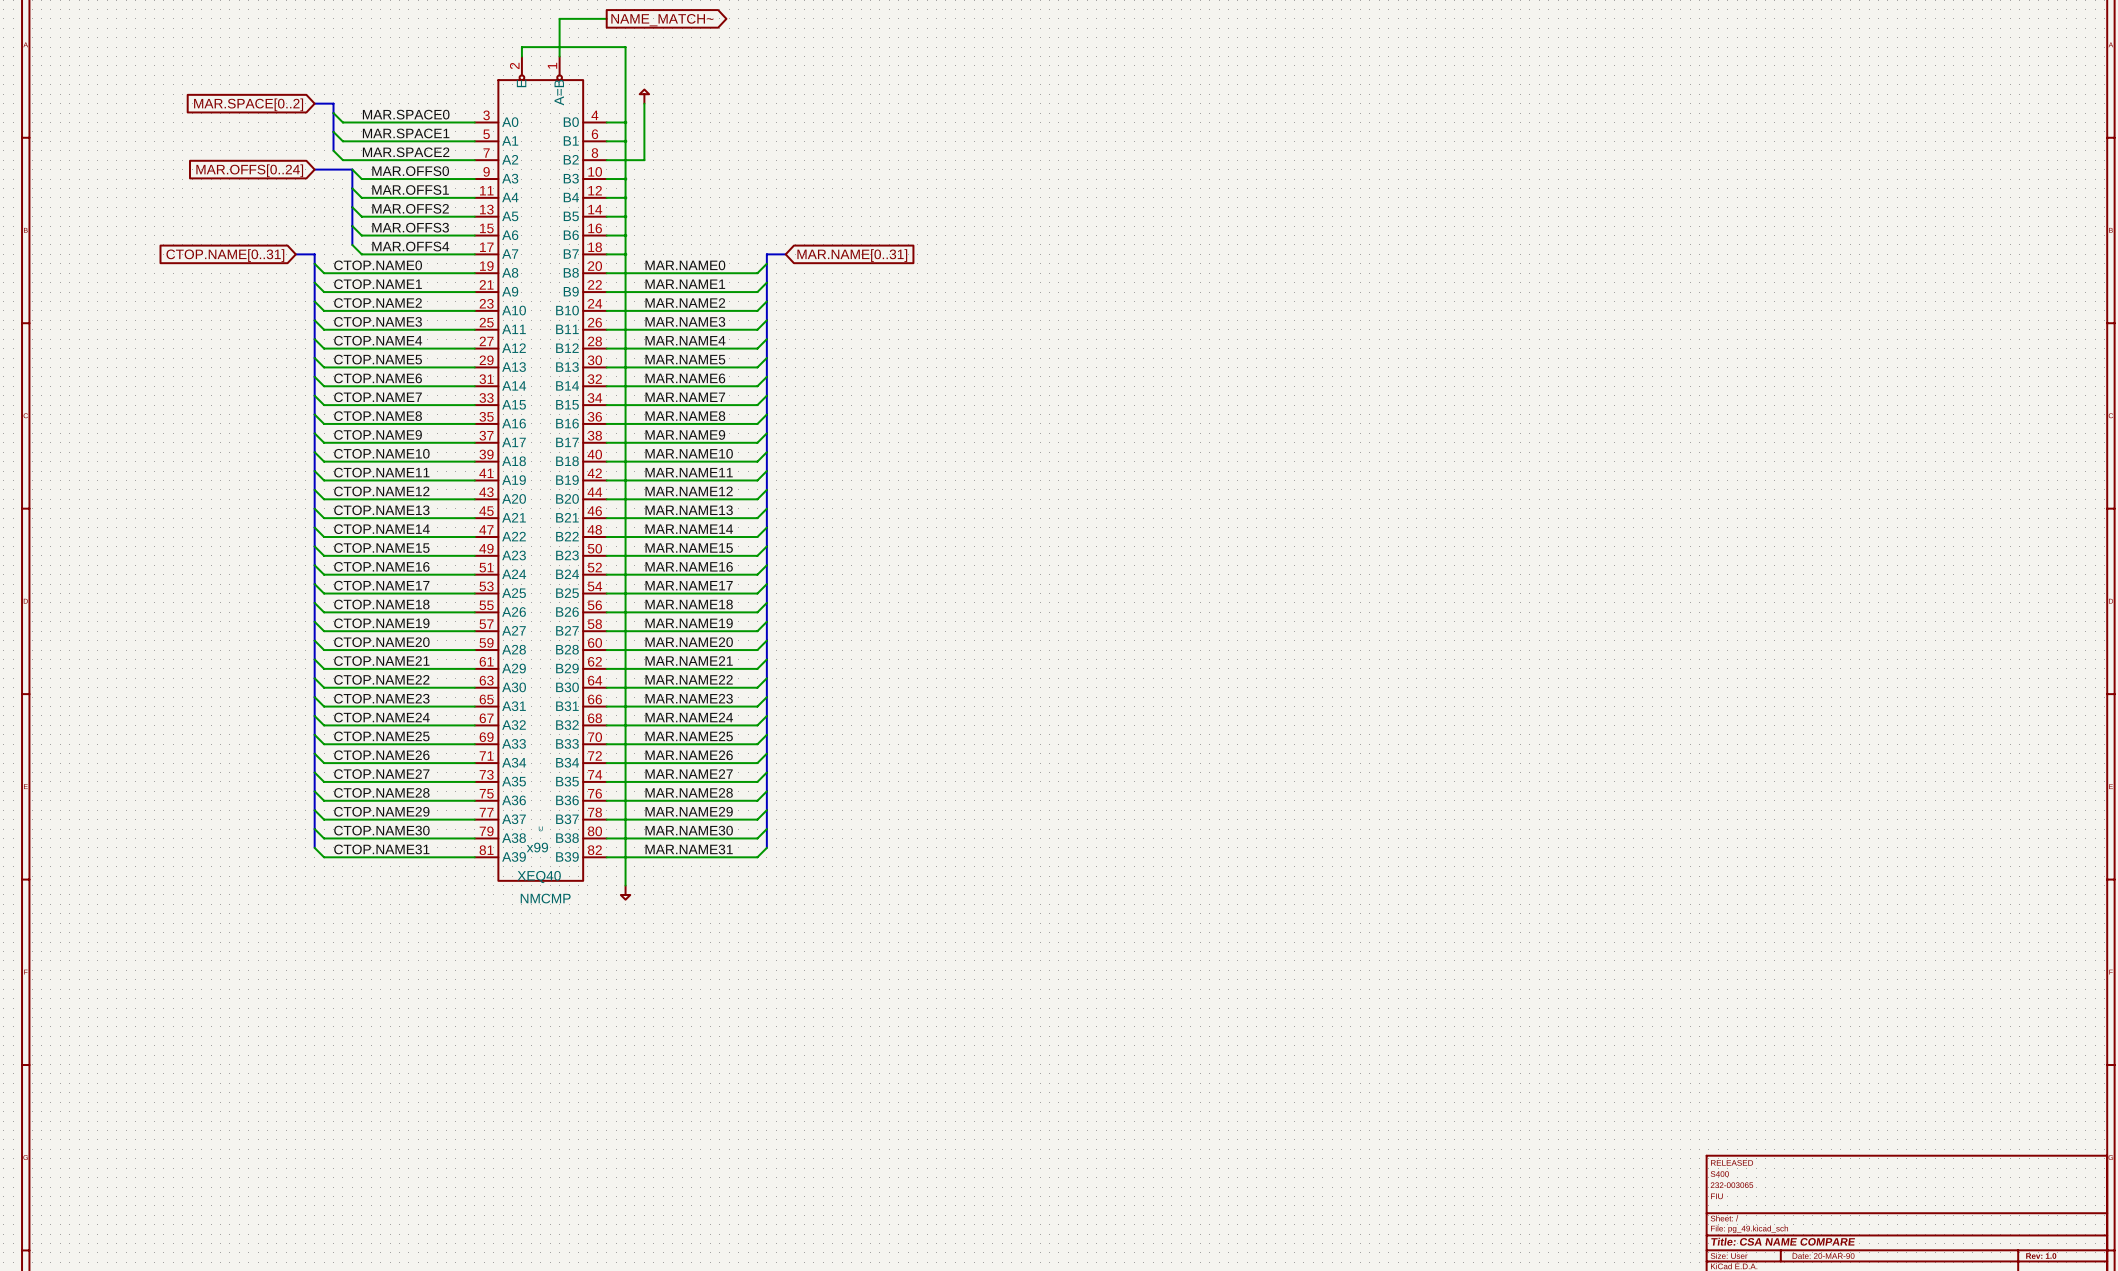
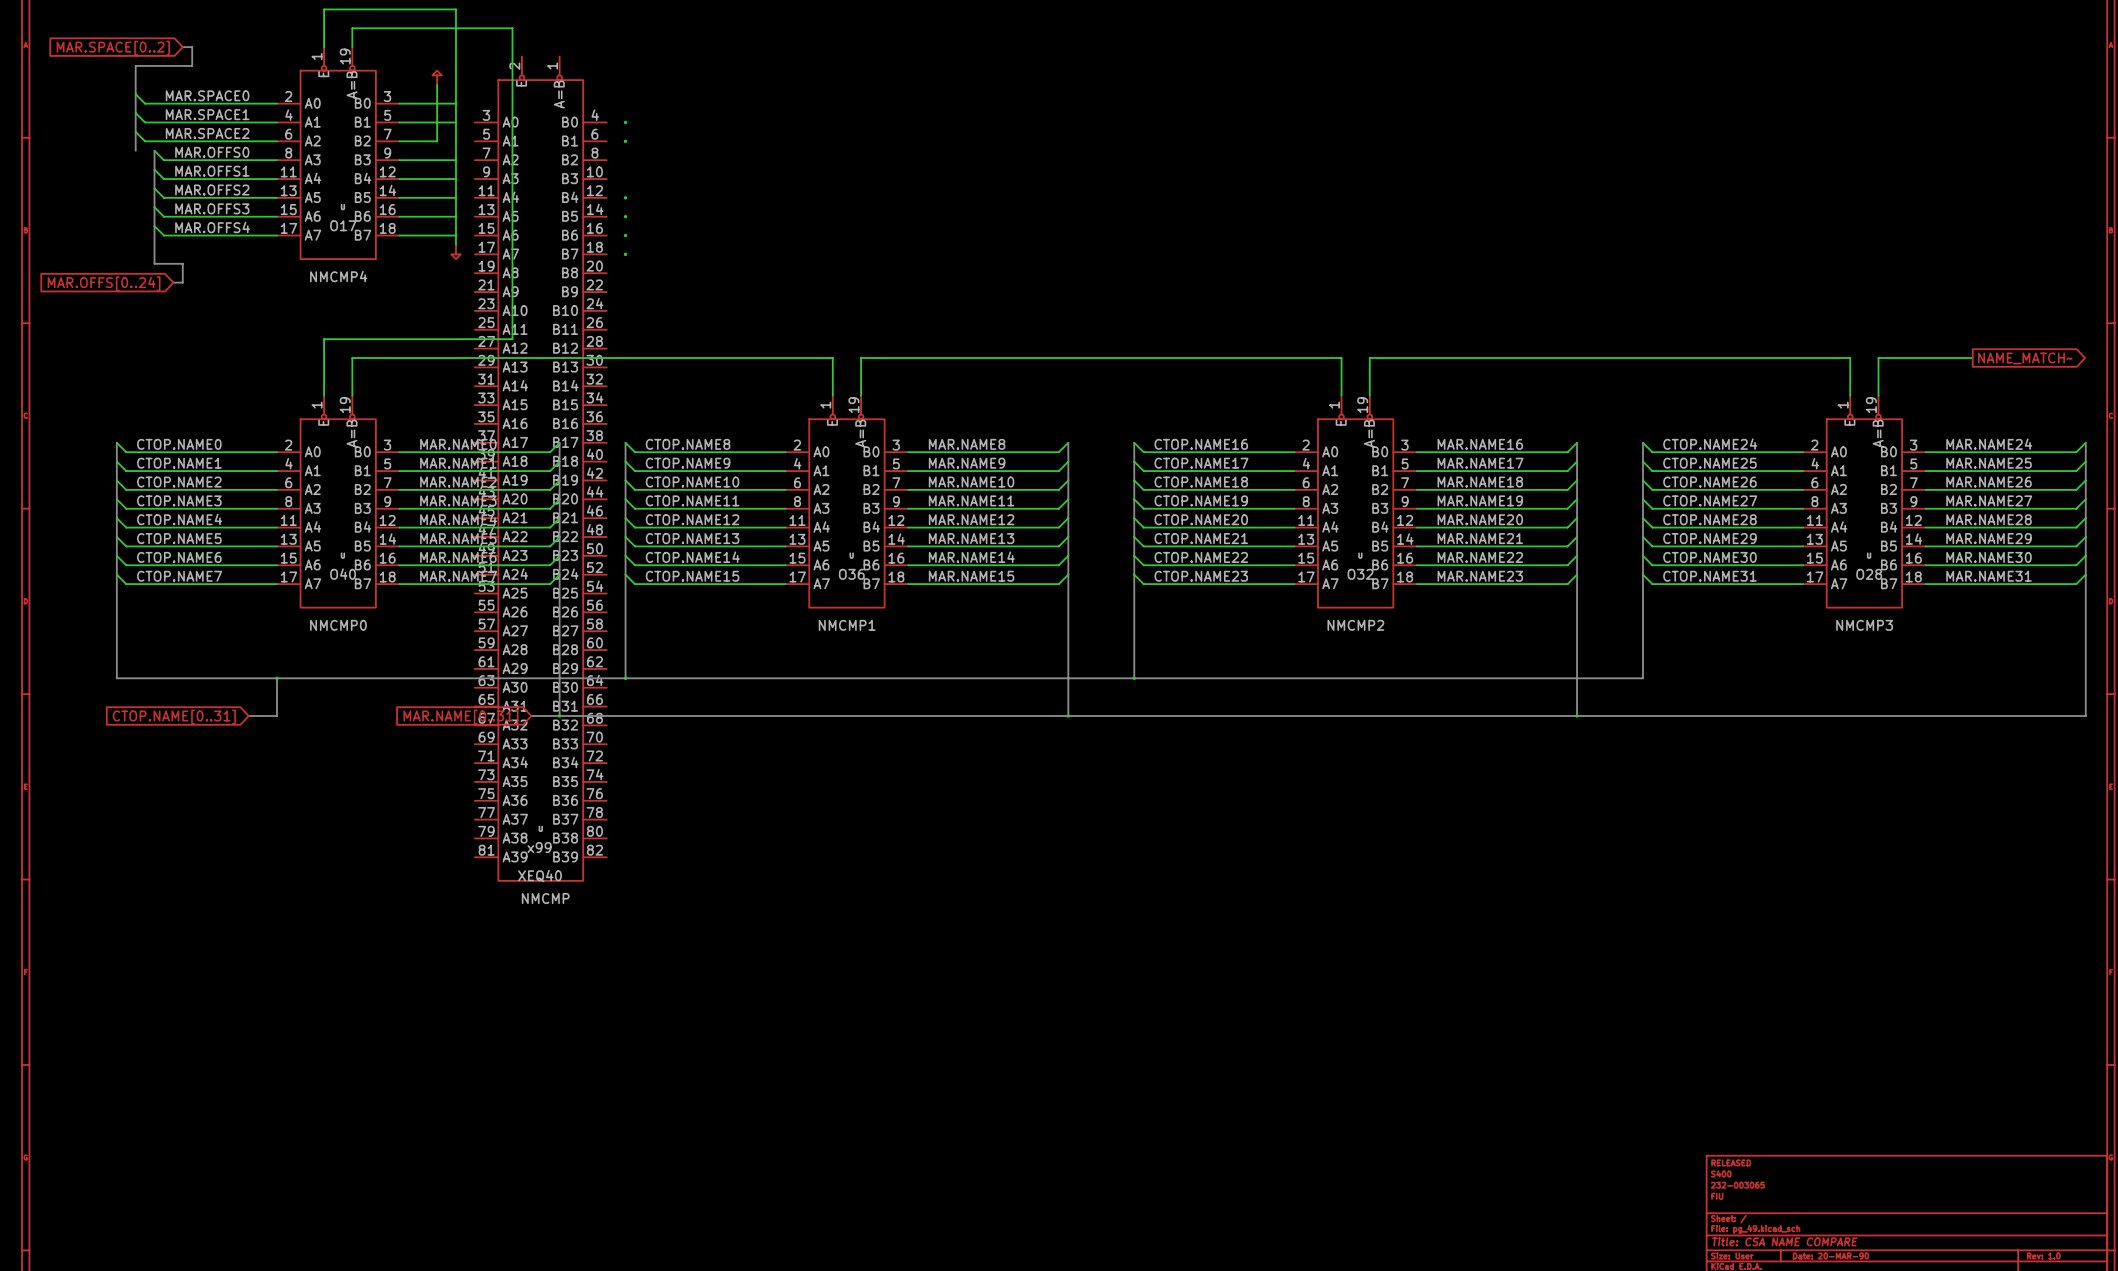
wire: (606, 18) (559, 18) (559, 56) -> none
global label: NAME_MATCH~ (662, 20) -> none
bus: none -> (182, 47) (192, 47) (192, 65) (135, 65) (135, 150)
wire: none -> (324, 47) (324, 9) (455, 9) (455, 244)
wire: none -> (352, 47) (352, 28) (512, 28) (512, 339) (324, 339) (324, 395)
global label: none -> MAR.SPACE[0..2] (113, 48)
wire: (521, 56) (521, 47) (625, 47) (625, 885) -> none
power symbol: none -> (437, 77)
wire: none -> (135, 94) (145, 103) (276, 103)
label: none -> MAR.SPACE0 (207, 95)
power symbol: (644, 96) -> none
bus: (314, 103) (333, 103) (333, 150) -> none
wire: none -> (399, 103) (455, 103)
wire: (644, 103) (644, 160) (606, 160) -> none
global label: MAR.SPACE[0..2] (248, 104) -> none
wire: none -> (135, 113) (145, 122) (276, 122)
wire: (333, 113) (342, 122) (399, 122) -> none
label: none -> MAR.SPACE1 (207, 114)
label: MAR.SPACE0 (406, 114) -> none
wire: (455, 122) (474, 122) -> none
wire: (606, 122) (625, 122) -> none
wire: none -> (135, 131) (145, 141) (276, 141)
wire: (333, 131) (342, 141) (399, 141) -> none
label: none -> MAR.SPACE2 (207, 133)
label: MAR.SPACE1 (406, 133) -> none
wire: (437, 141) (474, 141) -> (437, 141) (437, 84)
wire: (606, 141) (625, 141) -> none
wire: none -> (154, 150) (163, 160) (276, 160)
bus: none -> (154, 150) (154, 263) (182, 263) (182, 282) (173, 282)
wire: (333, 150) (342, 160) (399, 160) -> none
label: none -> MAR.OFFS0 (212, 152)
label: MAR.SPACE2 (406, 152) -> none
part: none -> (338, 153)
wire: (455, 160) (474, 160) -> none
wire: none -> (154, 169) (163, 179) (276, 179)
bus: (314, 169) (352, 169) (352, 244) -> none
global label: MAR.OFFS[0..24] (249, 170) -> none
label: none -> MAR.OFFS1 (212, 171)
label: MAR.OFFS0 (410, 171) -> none
wire: (455, 179) (474, 179) -> none
wire: (606, 179) (625, 179) -> none
wire: none -> (154, 188) (163, 197) (276, 197)
label: none -> MAR.OFFS2 (212, 190)
label: MAR.OFFS1 (410, 190) -> none
wire: (455, 197) (474, 197) -> none
wire: (606, 197) (625, 197) -> none
wire: none -> (154, 207) (163, 216) (276, 216)
label: none -> MAR.OFFS3 (212, 208)
label: MAR.OFFS2 (410, 208) -> none
wire: (455, 216) (474, 216) -> none
wire: (606, 216) (625, 216) -> none
wire: none -> (154, 226) (163, 235) (276, 235)
label: none -> MAR.OFFS4 (212, 227)
label: MAR.OFFS3 (410, 227) -> none
wire: (455, 235) (474, 235) -> none
wire: (606, 235) (625, 235) -> none
wire: (352, 244) (361, 254) (474, 254) -> none
label: MAR.OFFS4 (410, 246) -> none
power symbol: none -> (455, 252)
bus: (295, 254) (314, 254) (314, 847) -> none
wire: (606, 254) (625, 254) -> none
bus: (785, 254) (766, 254) (766, 847) -> none
global label: CTOP.NAME[0..31] (225, 255) -> none
global label: MAR.NAME[0..31] (852, 255) -> none
wire: (314, 263) (324, 273) (474, 273) -> none
wire: (766, 263) (757, 273) (606, 273) -> none
label: CTOP.NAME0 (378, 265) -> none
label: MAR.NAME0 (685, 265) -> none
wire: (314, 282) (324, 292) (474, 292) -> none
wire: (766, 282) (757, 292) (606, 292) -> none
global label: none -> MAR.OFFS[0..24] (104, 283)
label: CTOP.NAME1 (378, 284) -> none
label: MAR.NAME1 (685, 284) -> none
wire: (314, 301) (324, 310) (474, 310) -> none
wire: (766, 301) (757, 310) (606, 310) -> none
label: MAR.NAME2 (685, 302) -> none
label: CTOP.NAME2 (378, 303) -> none
wire: (314, 320) (324, 329) (474, 329) -> none
wire: (766, 320) (757, 329) (606, 329) -> none
label: CTOP.NAME3 (378, 321) -> none
label: MAR.NAME3 (685, 321) -> none
wire: (314, 339) (324, 348) (474, 348) -> none
wire: (766, 339) (757, 348) (606, 348) -> none
label: CTOP.NAME4 (378, 340) -> none
label: MAR.NAME4 (685, 340) -> none
wire: (314, 358) (324, 367) (474, 367) -> none
wire: (766, 358) (757, 367) (606, 367) -> none
wire: none -> (1972, 358) (1878, 358) (1878, 395)
label: CTOP.NAME5 (378, 359) -> none
label: MAR.NAME5 (685, 359) -> none
global label: none -> NAME_MATCH~ (2025, 358)
wire: (314, 376) (324, 386) (474, 386) -> none
wire: (766, 376) (757, 386) (606, 386) -> none
label: CTOP.NAME6 (378, 378) -> none
label: MAR.NAME6 (685, 378) -> none
wire: (314, 395) (324, 405) (474, 405) -> none
wire: none -> (352, 395) (352, 358) (832, 358) (832, 395)
wire: (766, 395) (757, 405) (606, 405) -> none
wire: none -> (861, 395) (861, 358) (1341, 358) (1341, 395)
wire: none -> (1369, 395) (1369, 358) (1850, 358) (1850, 395)
label: CTOP.NAME7 (378, 397) -> none
label: MAR.NAME7 (685, 397) -> none
wire: (314, 414) (324, 423) (474, 423) -> none
wire: (766, 414) (757, 423) (606, 423) -> none
label: CTOP.NAME8 (378, 416) -> none
label: MAR.NAME8 (685, 416) -> none
wire: (314, 433) (324, 442) (474, 442) -> none
wire: (766, 433) (757, 442) (606, 442) -> none
label: CTOP.NAME9 (378, 434) -> none
label: MAR.NAME9 (685, 434) -> none
wire: none -> (116, 442) (126, 452) (276, 452)
bus: none -> (116, 442) (116, 678) (1642, 678) (1642, 442)
wire: none -> (559, 442) (550, 452) (399, 452)
bus: none -> (559, 442) (559, 715)
wire: none -> (625, 442) (634, 452) (785, 452)
bus: none -> (625, 442) (625, 678)
wire: none -> (1068, 442) (1058, 452) (908, 452)
bus: none -> (1068, 442) (1068, 715)
wire: none -> (1134, 442) (1143, 452) (1294, 452)
bus: none -> (1134, 442) (1134, 678)
wire: none -> (1577, 442) (1567, 452) (1416, 452)
bus: none -> (1577, 442) (1577, 715)
wire: none -> (1642, 442) (1652, 452) (1803, 452)
wire: none -> (2085, 442) (2076, 452) (1925, 452)
bus: none -> (2085, 442) (2085, 715) (531, 715)
label: none -> CTOP.NAME0 (179, 444)
label: none -> MAR.NAME0 (458, 444)
label: none -> CTOP.NAME8 (688, 444)
label: none -> MAR.NAME8 (967, 444)
label: none -> CTOP.NAME16 (1201, 444)
label: none -> MAR.NAME16 (1480, 444)
label: none -> CTOP.NAME24 (1710, 444)
label: none -> MAR.NAME24 (1989, 444)
wire: (314, 452) (324, 461) (474, 461) -> none
wire: (766, 452) (757, 461) (606, 461) -> none
label: CTOP.NAME10 (381, 453) -> none
label: MAR.NAME10 (689, 453) -> none
wire: none -> (116, 461) (126, 471) (276, 471)
wire: none -> (559, 461) (550, 471) (399, 471)
wire: none -> (625, 461) (634, 471) (785, 471)
wire: none -> (1068, 461) (1058, 471) (908, 471)
wire: none -> (1134, 461) (1143, 471) (1294, 471)
wire: none -> (1577, 461) (1567, 471) (1416, 471)
wire: none -> (1642, 461) (1652, 471) (1803, 471)
wire: none -> (2085, 461) (2076, 471) (1925, 471)
label: none -> CTOP.NAME1 (179, 463)
label: none -> MAR.NAME1 (458, 463)
label: none -> CTOP.NAME9 (688, 463)
label: none -> MAR.NAME9 (967, 463)
label: none -> CTOP.NAME17 (1201, 463)
label: none -> MAR.NAME17 (1480, 463)
label: none -> CTOP.NAME25 (1709, 463)
label: none -> MAR.NAME25 (1989, 463)
wire: (314, 471) (324, 480) (474, 480) -> none
wire: (766, 471) (757, 480) (606, 480) -> none
label: CTOP.NAME11 (381, 472) -> none
label: MAR.NAME11 (689, 472) -> none
wire: none -> (116, 480) (126, 489) (276, 489)
wire: none -> (559, 480) (550, 489) (399, 489)
wire: none -> (625, 480) (634, 489) (785, 489)
wire: none -> (1068, 480) (1058, 489) (908, 489)
wire: none -> (1134, 480) (1143, 489) (1294, 489)
wire: none -> (1577, 480) (1567, 489) (1416, 489)
wire: none -> (1642, 480) (1652, 489) (1803, 489)
wire: none -> (2085, 480) (2076, 489) (1925, 489)
label: none -> MAR.NAME2 (458, 482)
label: none -> CTOP.NAME2 (179, 482)
label: none -> CTOP.NAME10 (692, 482)
label: none -> MAR.NAME10 (971, 482)
label: none -> CTOP.NAME18 (1201, 482)
label: none -> MAR.NAME18 (1480, 482)
label: none -> CTOP.NAME26 (1709, 482)
label: none -> MAR.NAME26 (1989, 482)
wire: (314, 489) (324, 499) (474, 499) -> none
wire: (766, 489) (757, 499) (606, 499) -> none
label: CTOP.NAME12 (381, 491) -> none
label: MAR.NAME12 (689, 491) -> none
wire: none -> (116, 499) (126, 508) (276, 508)
wire: none -> (559, 499) (550, 508) (399, 508)
wire: none -> (625, 499) (634, 508) (785, 508)
wire: none -> (1068, 499) (1058, 508) (908, 508)
wire: none -> (1134, 499) (1143, 508) (1294, 508)
wire: none -> (1577, 499) (1567, 508) (1416, 508)
wire: none -> (1642, 499) (1652, 508) (1803, 508)
wire: none -> (2085, 499) (2076, 508) (1925, 508)
label: none -> CTOP.NAME3 (179, 500)
label: none -> MAR.NAME3 (458, 500)
label: none -> CTOP.NAME11 (692, 500)
label: none -> MAR.NAME11 (971, 500)
label: none -> CTOP.NAME19 (1201, 500)
label: none -> MAR.NAME19 (1480, 500)
label: none -> CTOP.NAME27 (1710, 500)
label: none -> MAR.NAME27 (1989, 500)
part: none -> (338, 501)
part: none -> (846, 501)
part: none -> (1355, 501)
part: none -> (1864, 501)
wire: (314, 508) (324, 518) (474, 518) -> none
wire: (766, 508) (757, 518) (606, 518) -> none
label: CTOP.NAME13 (381, 510) -> none
label: MAR.NAME13 (689, 510) -> none
wire: none -> (116, 518) (126, 527) (276, 527)
wire: none -> (559, 518) (550, 527) (399, 527)
wire: none -> (625, 518) (634, 527) (785, 527)
wire: none -> (1068, 518) (1058, 527) (908, 527)
wire: none -> (1134, 518) (1143, 527) (1294, 527)
wire: none -> (1577, 518) (1567, 527) (1416, 527)
wire: none -> (1642, 518) (1652, 527) (1803, 527)
wire: none -> (2085, 518) (2076, 527) (1925, 527)
label: none -> CTOP.NAME4 (179, 519)
label: none -> MAR.NAME4 (458, 519)
label: none -> CTOP.NAME12 (692, 519)
label: none -> MAR.NAME12 (971, 519)
label: none -> CTOP.NAME20 (1201, 519)
label: none -> MAR.NAME20 (1480, 519)
label: none -> CTOP.NAME28 (1709, 519)
label: none -> MAR.NAME28 (1989, 519)
wire: (314, 527) (324, 537) (474, 537) -> none
wire: (766, 527) (757, 537) (606, 537) -> none
label: CTOP.NAME14 (381, 529) -> none
label: MAR.NAME14 (689, 529) -> none
wire: none -> (116, 537) (126, 546) (276, 546)
wire: none -> (559, 537) (550, 546) (399, 546)
wire: none -> (625, 537) (634, 546) (785, 546)
wire: none -> (1068, 537) (1058, 546) (908, 546)
wire: none -> (1134, 537) (1143, 546) (1294, 546)
wire: none -> (1577, 537) (1567, 546) (1416, 546)
wire: none -> (1642, 537) (1652, 546) (1803, 546)
wire: none -> (2085, 537) (2076, 546) (1925, 546)
label: none -> CTOP.NAME5 (179, 538)
label: none -> MAR.NAME5 (458, 538)
label: none -> CTOP.NAME13 (692, 538)
label: none -> MAR.NAME13 (971, 538)
label: none -> CTOP.NAME21 (1201, 538)
label: none -> MAR.NAME21 (1480, 538)
label: none -> CTOP.NAME29 (1709, 538)
label: none -> MAR.NAME29 (1989, 538)
wire: (314, 546) (324, 555) (474, 555) -> none
wire: (766, 546) (757, 555) (606, 555) -> none
label: CTOP.NAME15 (381, 547) -> none
label: MAR.NAME15 (689, 548) -> none
wire: none -> (116, 555) (126, 565) (276, 565)
wire: none -> (559, 555) (550, 565) (399, 565)
wire: none -> (625, 555) (634, 565) (785, 565)
wire: none -> (1068, 555) (1058, 565) (908, 565)
wire: none -> (1134, 555) (1143, 565) (1294, 565)
wire: none -> (1577, 555) (1567, 565) (1416, 565)
wire: none -> (1642, 555) (1652, 565) (1803, 565)
wire: none -> (2085, 555) (2076, 565) (1925, 565)
label: none -> CTOP.NAME6 (179, 557)
label: none -> MAR.NAME6 (458, 557)
label: none -> CTOP.NAME14 (692, 557)
label: none -> MAR.NAME14 (971, 557)
label: none -> CTOP.NAME22 (1201, 557)
label: none -> MAR.NAME22 (1480, 557)
label: none -> CTOP.NAME30 (1709, 557)
label: none -> MAR.NAME30 (1989, 557)
wire: (314, 565) (324, 574) (474, 574) -> none
wire: (766, 565) (757, 574) (606, 574) -> none
label: CTOP.NAME16 (381, 566) -> none
label: MAR.NAME16 (689, 566) -> none
wire: none -> (116, 574) (126, 584) (276, 584)
wire: none -> (559, 574) (550, 584) (399, 584)
wire: none -> (625, 574) (634, 584) (785, 584)
wire: none -> (1068, 574) (1058, 584) (908, 584)
wire: none -> (1134, 574) (1143, 584) (1294, 584)
wire: none -> (1577, 574) (1567, 584) (1416, 584)
wire: none -> (1642, 574) (1652, 584) (1803, 584)
wire: none -> (2085, 574) (2076, 584) (1925, 584)
label: none -> CTOP.NAME7 (179, 576)
label: none -> MAR.NAME7 (458, 576)
label: none -> CTOP.NAME15 (692, 576)
label: none -> MAR.NAME15 (971, 576)
label: none -> CTOP.NAME23 (1201, 576)
label: none -> MAR.NAME23 (1480, 576)
label: none -> CTOP.NAME31 (1709, 576)
label: none -> MAR.NAME31 (1989, 576)
wire: (314, 584) (324, 593) (474, 593) -> none
wire: (766, 584) (757, 593) (606, 593) -> none
label: CTOP.NAME17 (381, 585) -> none
label: MAR.NAME17 (689, 585) -> none
wire: (314, 602) (324, 612) (474, 612) -> none
wire: (766, 602) (757, 612) (606, 612) -> none
label: CTOP.NAME18 (381, 604) -> none
label: MAR.NAME18 (689, 604) -> none
wire: (314, 621) (324, 631) (474, 631) -> none
wire: (766, 621) (757, 631) (606, 631) -> none
label: CTOP.NAME19 (381, 623) -> none
label: MAR.NAME19 (689, 623) -> none
wire: (314, 640) (324, 650) (474, 650) -> none
wire: (766, 640) (757, 650) (606, 650) -> none
label: CTOP.NAME20 (381, 642) -> none
label: MAR.NAME20 (689, 642) -> none
wire: (314, 659) (324, 668) (474, 668) -> none
wire: (766, 659) (757, 668) (606, 668) -> none
label: MAR.NAME21 (689, 660) -> none
label: CTOP.NAME21 (381, 661) -> none
bus: none -> (276, 678) (276, 715) (248, 715)
junction: none -> (276, 678)
wire: (314, 678) (324, 687) (474, 687) -> none
junction: none -> (625, 678)
wire: (766, 678) (757, 687) (606, 687) -> none
junction: none -> (1134, 678)
label: CTOP.NAME22 (381, 679) -> none
label: MAR.NAME22 (689, 679) -> none
wire: (314, 697) (324, 706) (474, 706) -> none
wire: (766, 697) (757, 706) (606, 706) -> none
label: CTOP.NAME23 (381, 698) -> none
label: MAR.NAME23 (689, 698) -> none
wire: (314, 715) (324, 725) (474, 725) -> none
junction: none -> (559, 715)
wire: (766, 715) (757, 725) (606, 725) -> none
junction: none -> (1068, 715)
junction: none -> (1577, 715)
global label: none -> CTOP.NAME[0..31] (174, 717)
label: CTOP.NAME24 (381, 717) -> none
global label: none -> MAR.NAME[0..31] (460, 717)
label: MAR.NAME24 (689, 717) -> none
wire: (314, 734) (324, 744) (474, 744) -> none
wire: (766, 734) (757, 744) (606, 744) -> none
label: CTOP.NAME25 (381, 736) -> none
label: MAR.NAME25 (689, 736) -> none
wire: (314, 753) (324, 763) (474, 763) -> none
wire: (766, 753) (757, 763) (606, 763) -> none
label: CTOP.NAME26 (381, 755) -> none
label: MAR.NAME26 (689, 755) -> none
wire: (314, 772) (324, 781) (474, 781) -> none
wire: (766, 772) (757, 781) (606, 781) -> none
label: CTOP.NAME27 (381, 774) -> none
label: MAR.NAME27 (689, 774) -> none
wire: (314, 791) (324, 800) (474, 800) -> none
wire: (766, 791) (757, 800) (606, 800) -> none
label: CTOP.NAME28 (381, 792) -> none
label: MAR.NAME28 (689, 792) -> none
wire: (314, 810) (324, 819) (474, 819) -> none
wire: (766, 810) (757, 819) (606, 819) -> none
label: CTOP.NAME29 (381, 811) -> none
label: MAR.NAME29 (689, 811) -> none
wire: (314, 829) (324, 838) (474, 838) -> none
wire: (766, 829) (757, 838) (606, 838) -> none
label: CTOP.NAME30 (381, 830) -> none
label: MAR.NAME30 (689, 830) -> none
wire: (314, 847) (324, 857) (474, 857) -> none
wire: (766, 847) (757, 857) (606, 857) -> none
label: CTOP.NAME31 (381, 849) -> none
label: MAR.NAME31 (689, 849) -> none
power symbol: (625, 892) -> none

